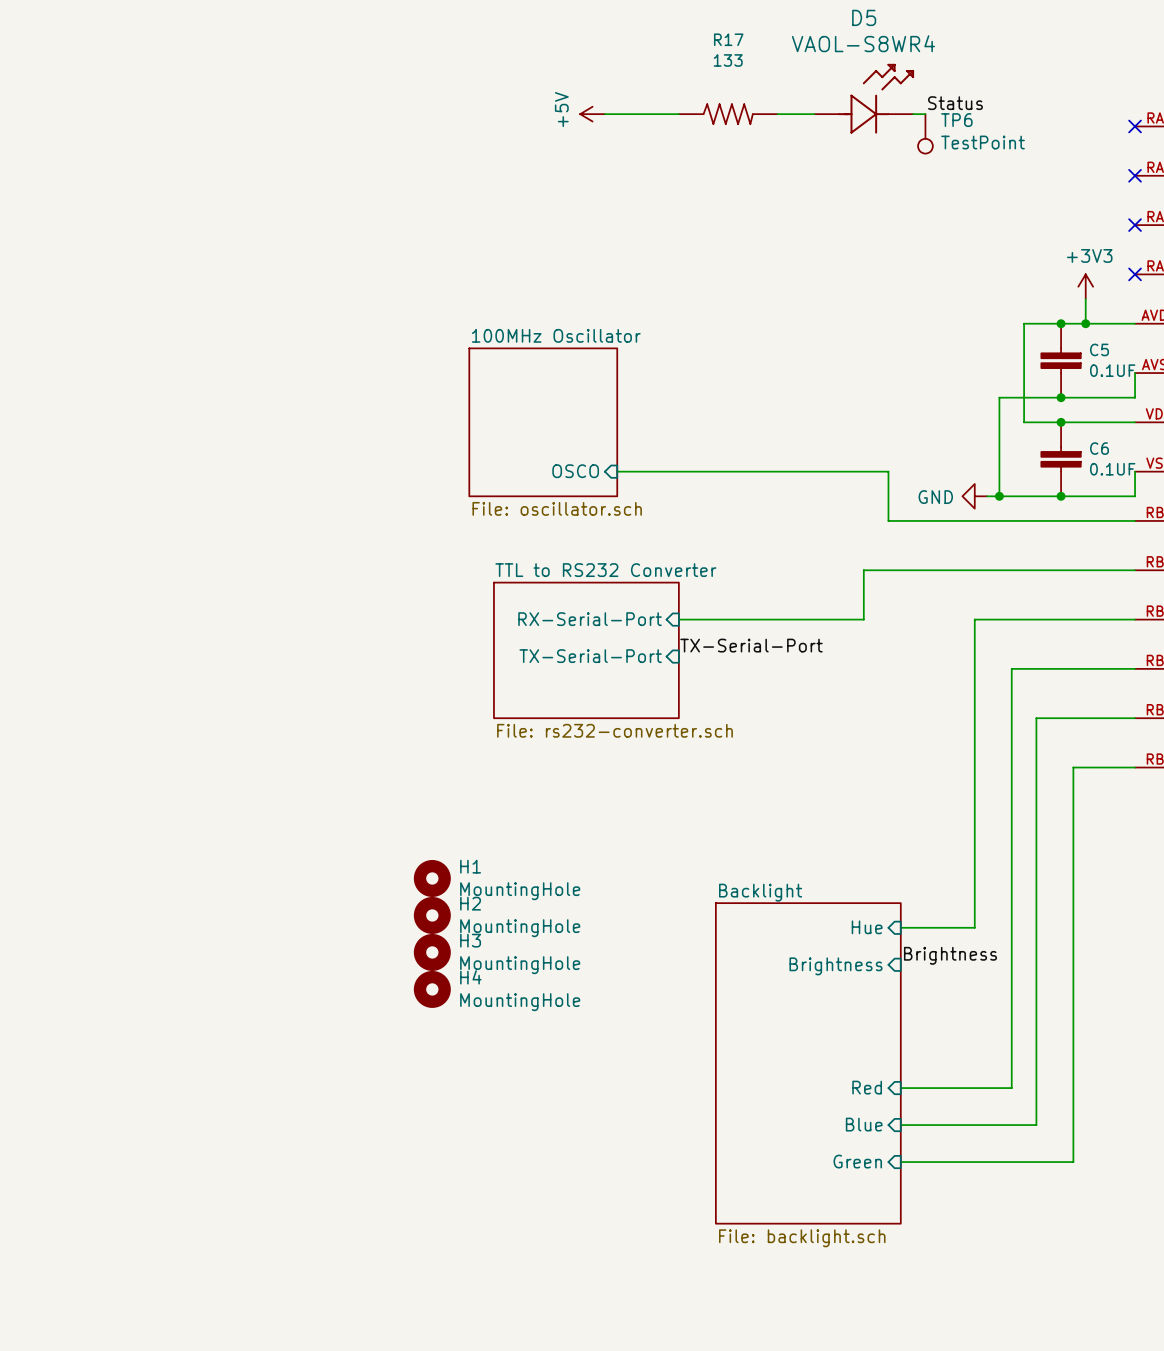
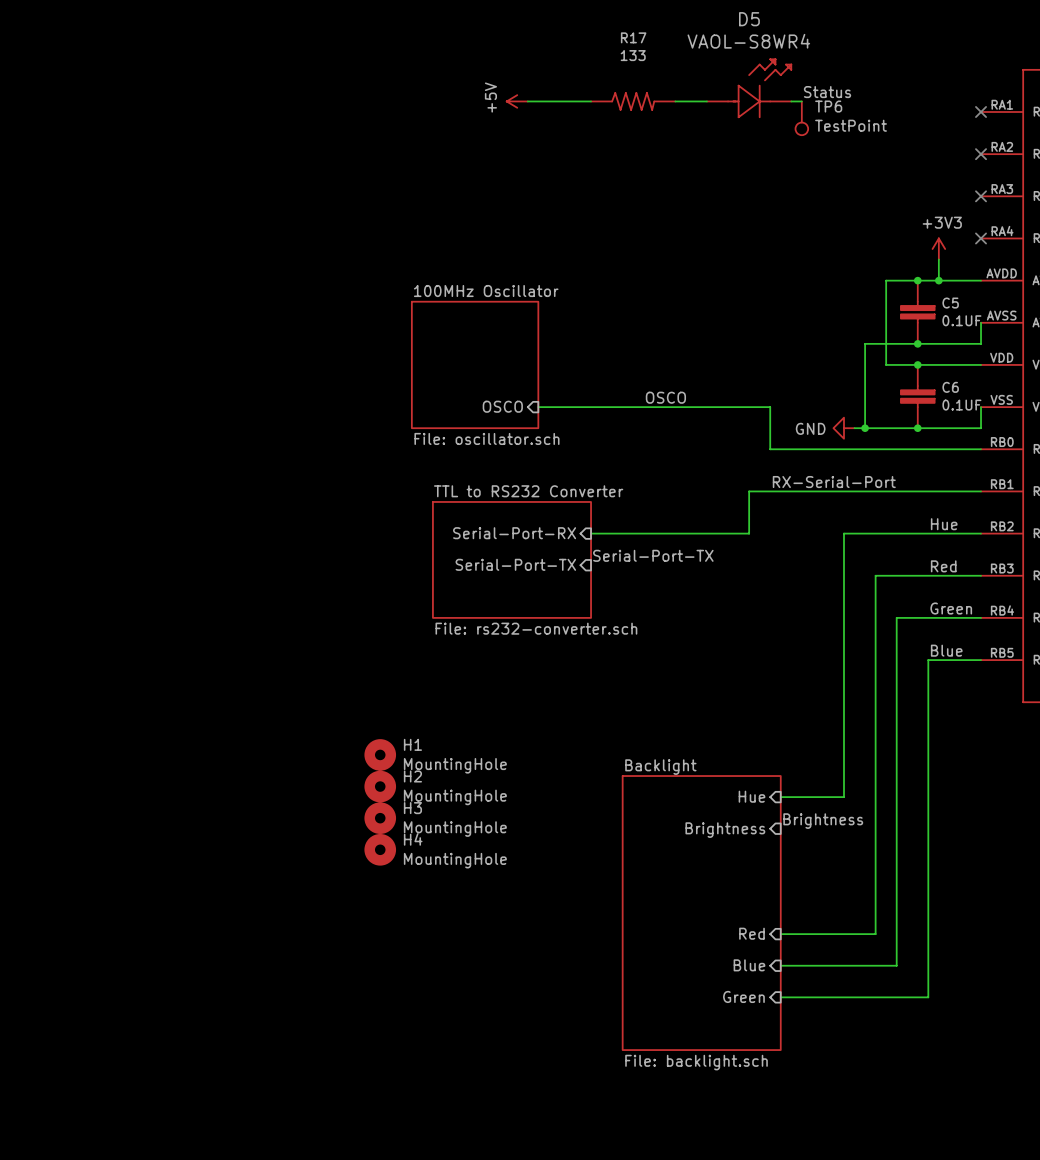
label: none -> OSCO (665, 397)
label: none -> RX-Serial-Port (834, 482)
label: none -> Hue (944, 524)
sheet pin: RX-Serial-Port (590, 619) -> Serial-Port-RX (514, 533)
label: TX-Serial-Port (751, 645) -> Serial-Port-TX (653, 555)
sheet pin: TX-Serial-Port (590, 656) -> Serial-Port-TX (515, 564)
label: none -> Red (943, 566)
label: none -> Green (951, 608)
label: none -> Blue (946, 650)

